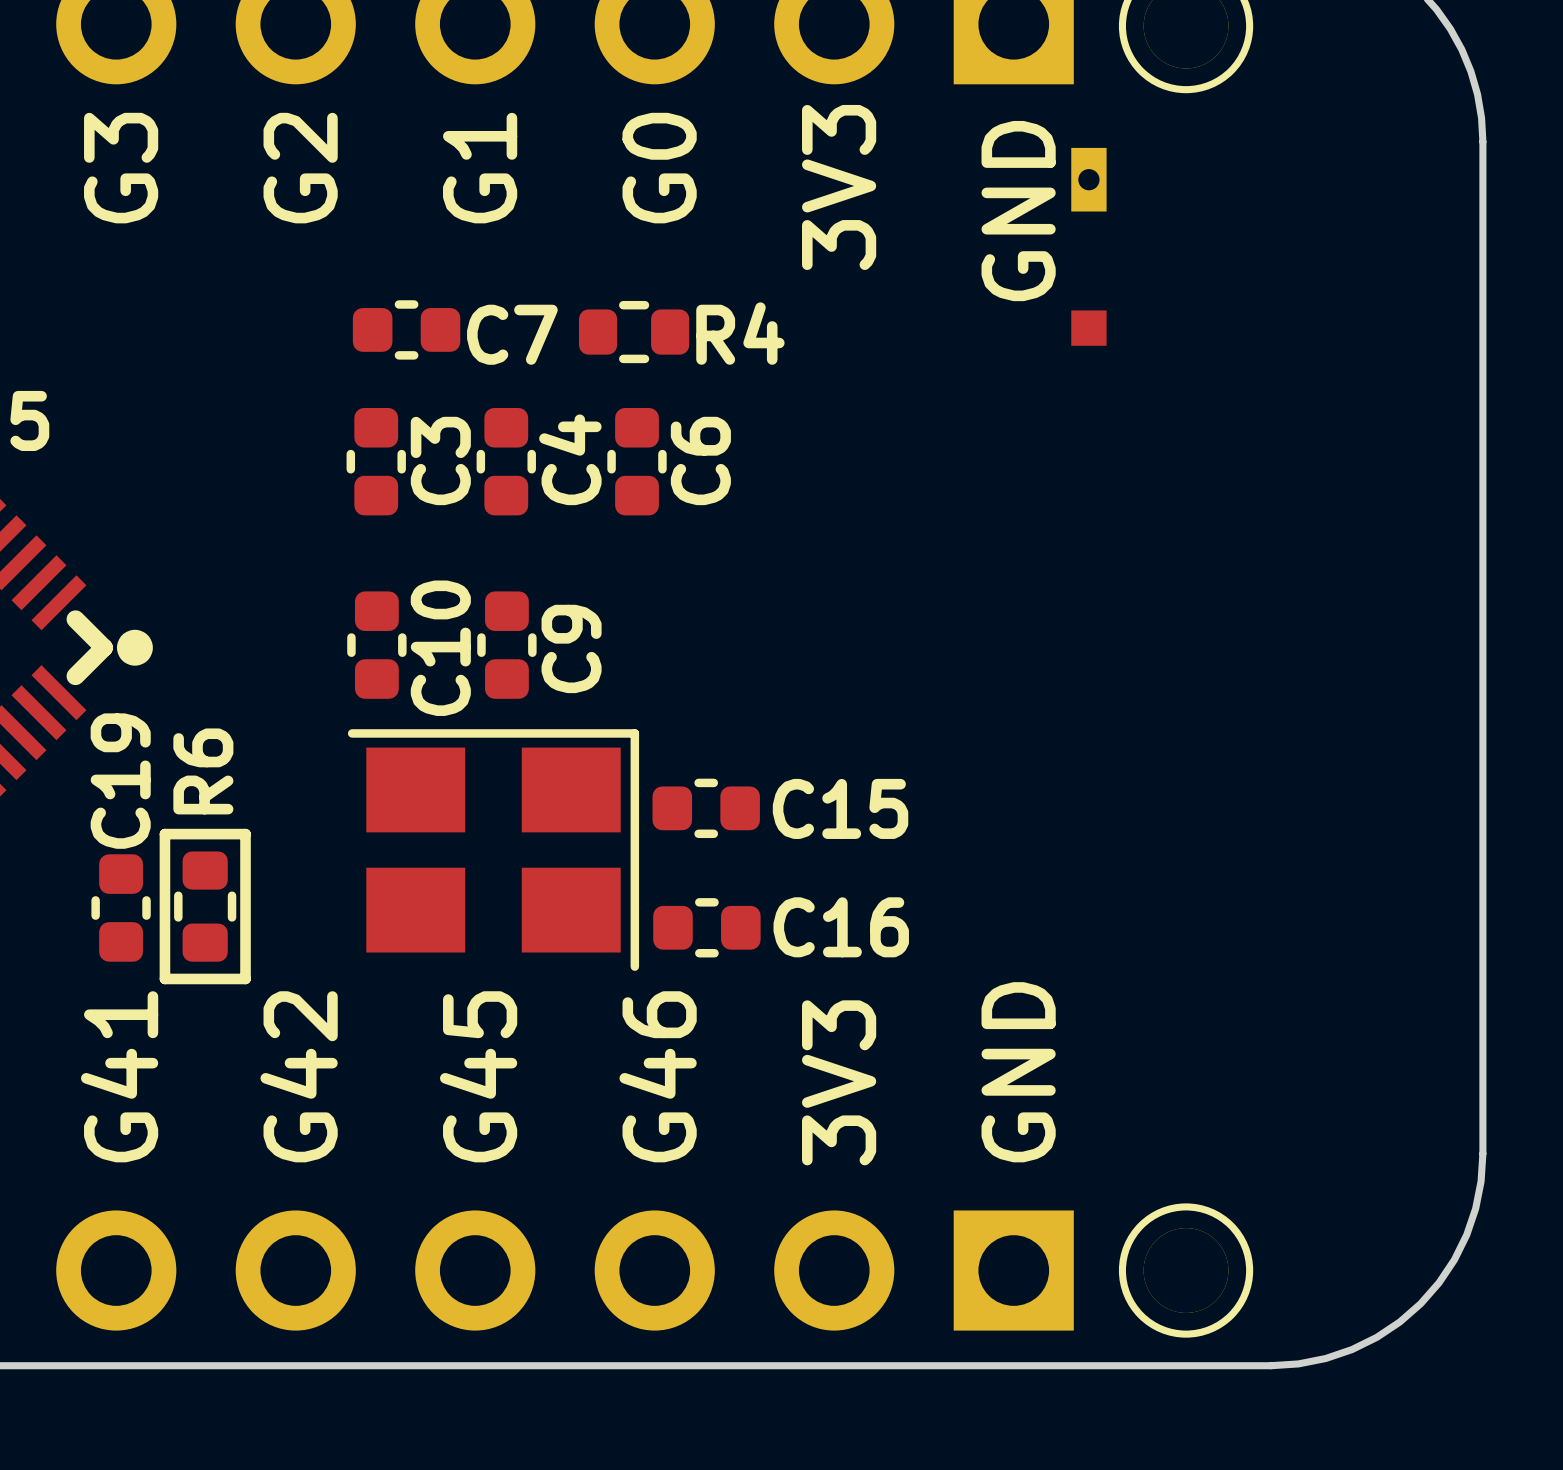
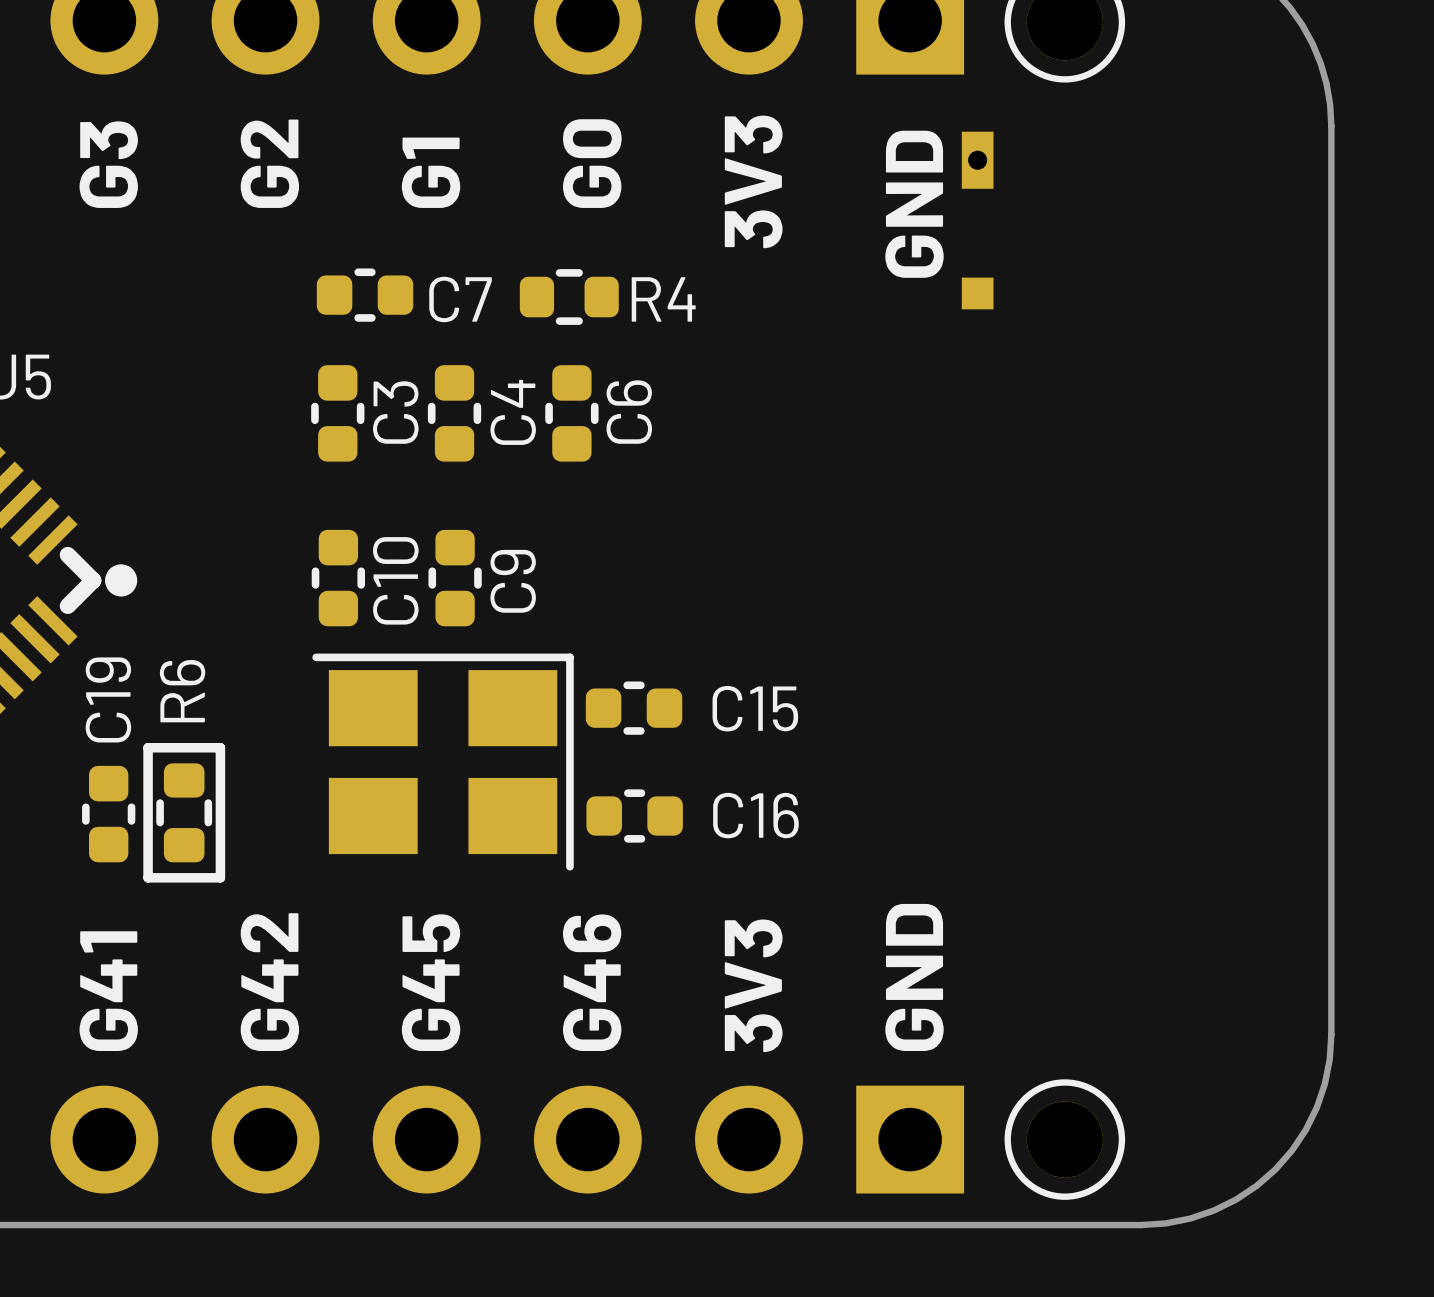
C15 position: (706, 808) -> (634, 708)
C16 position: (706, 927) -> (634, 816)

